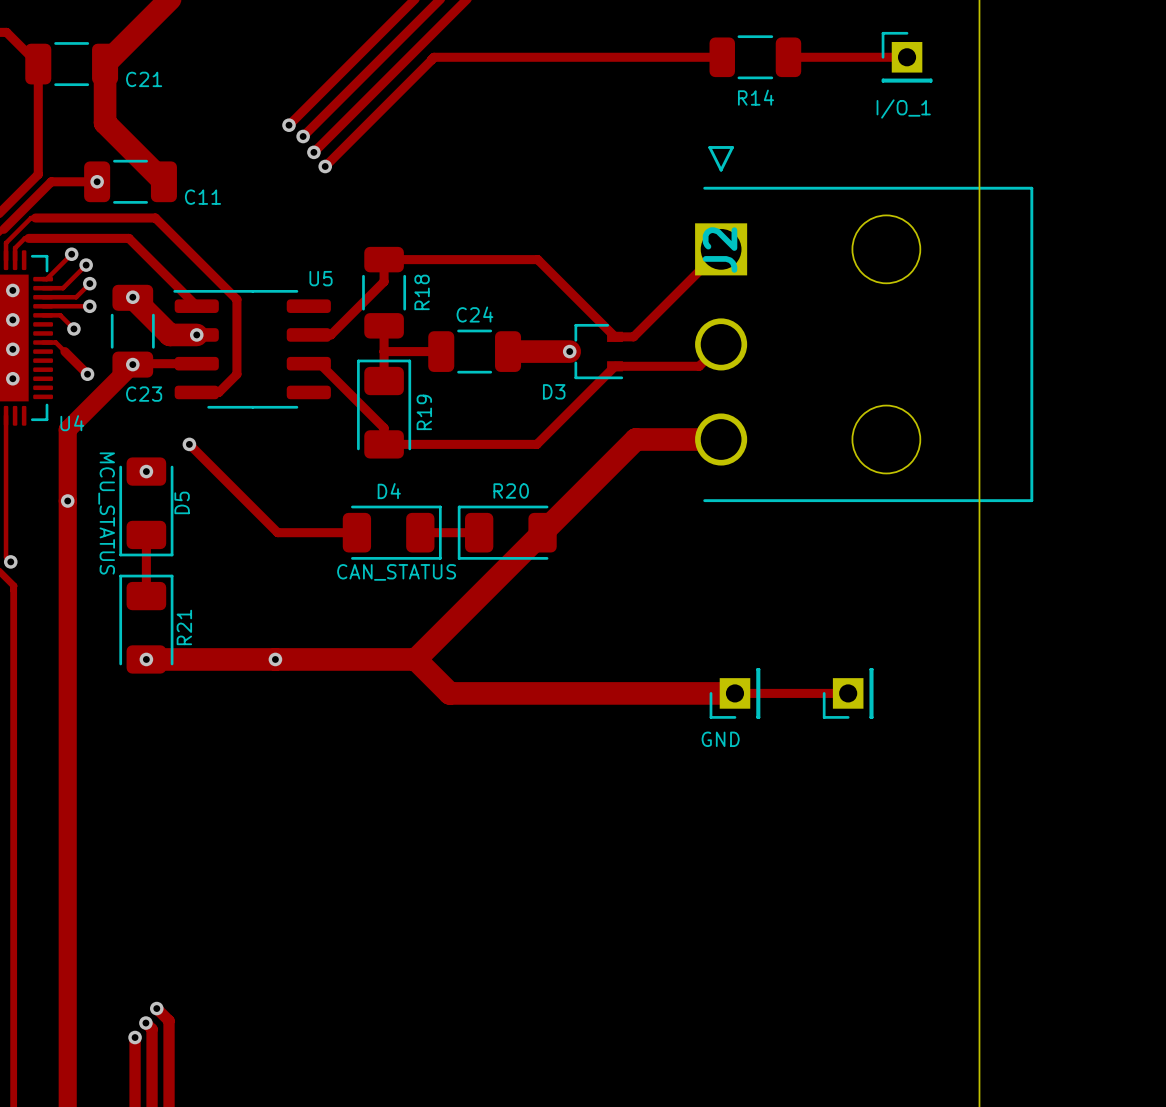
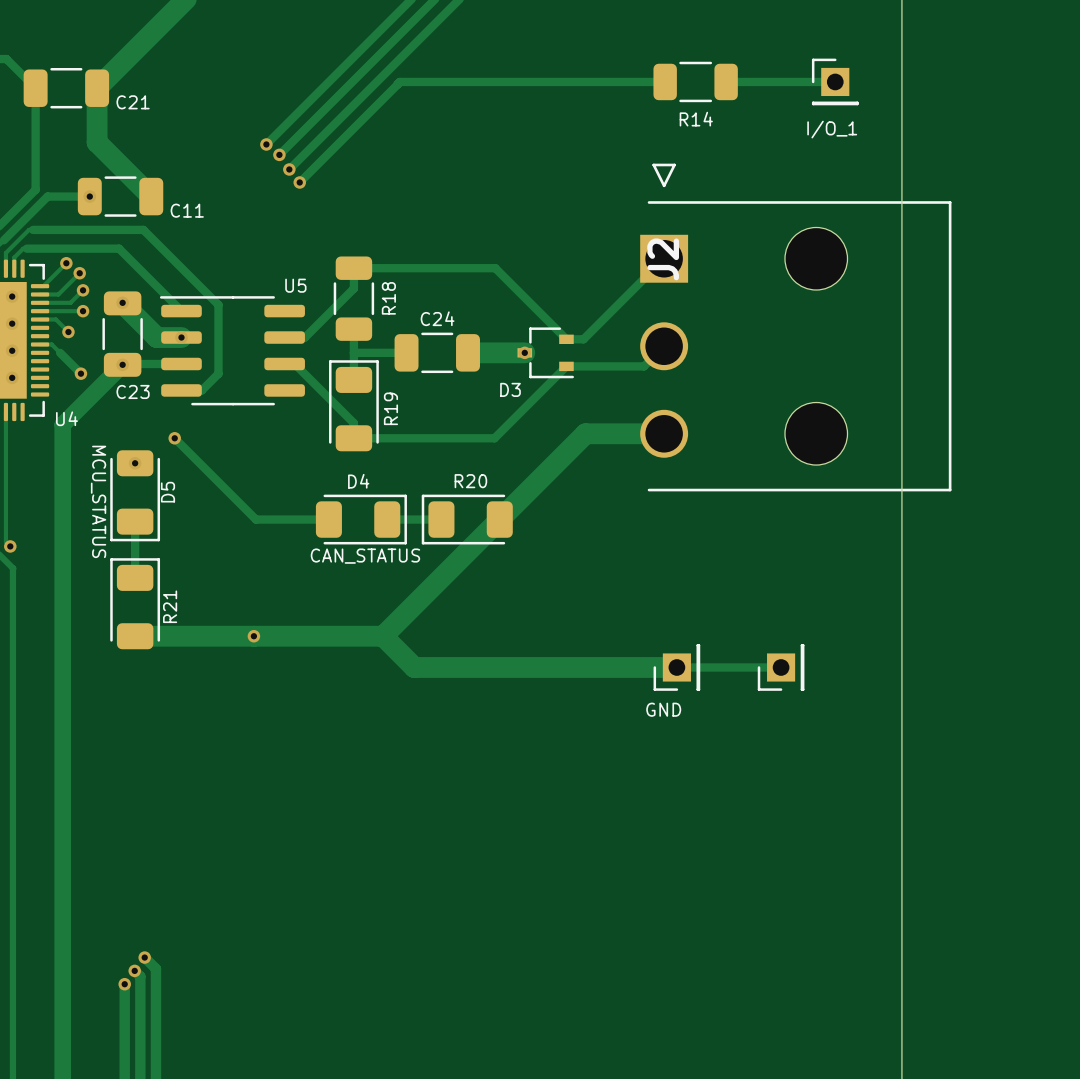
via: (67, 500) -> none
via: (146, 659) -> none

